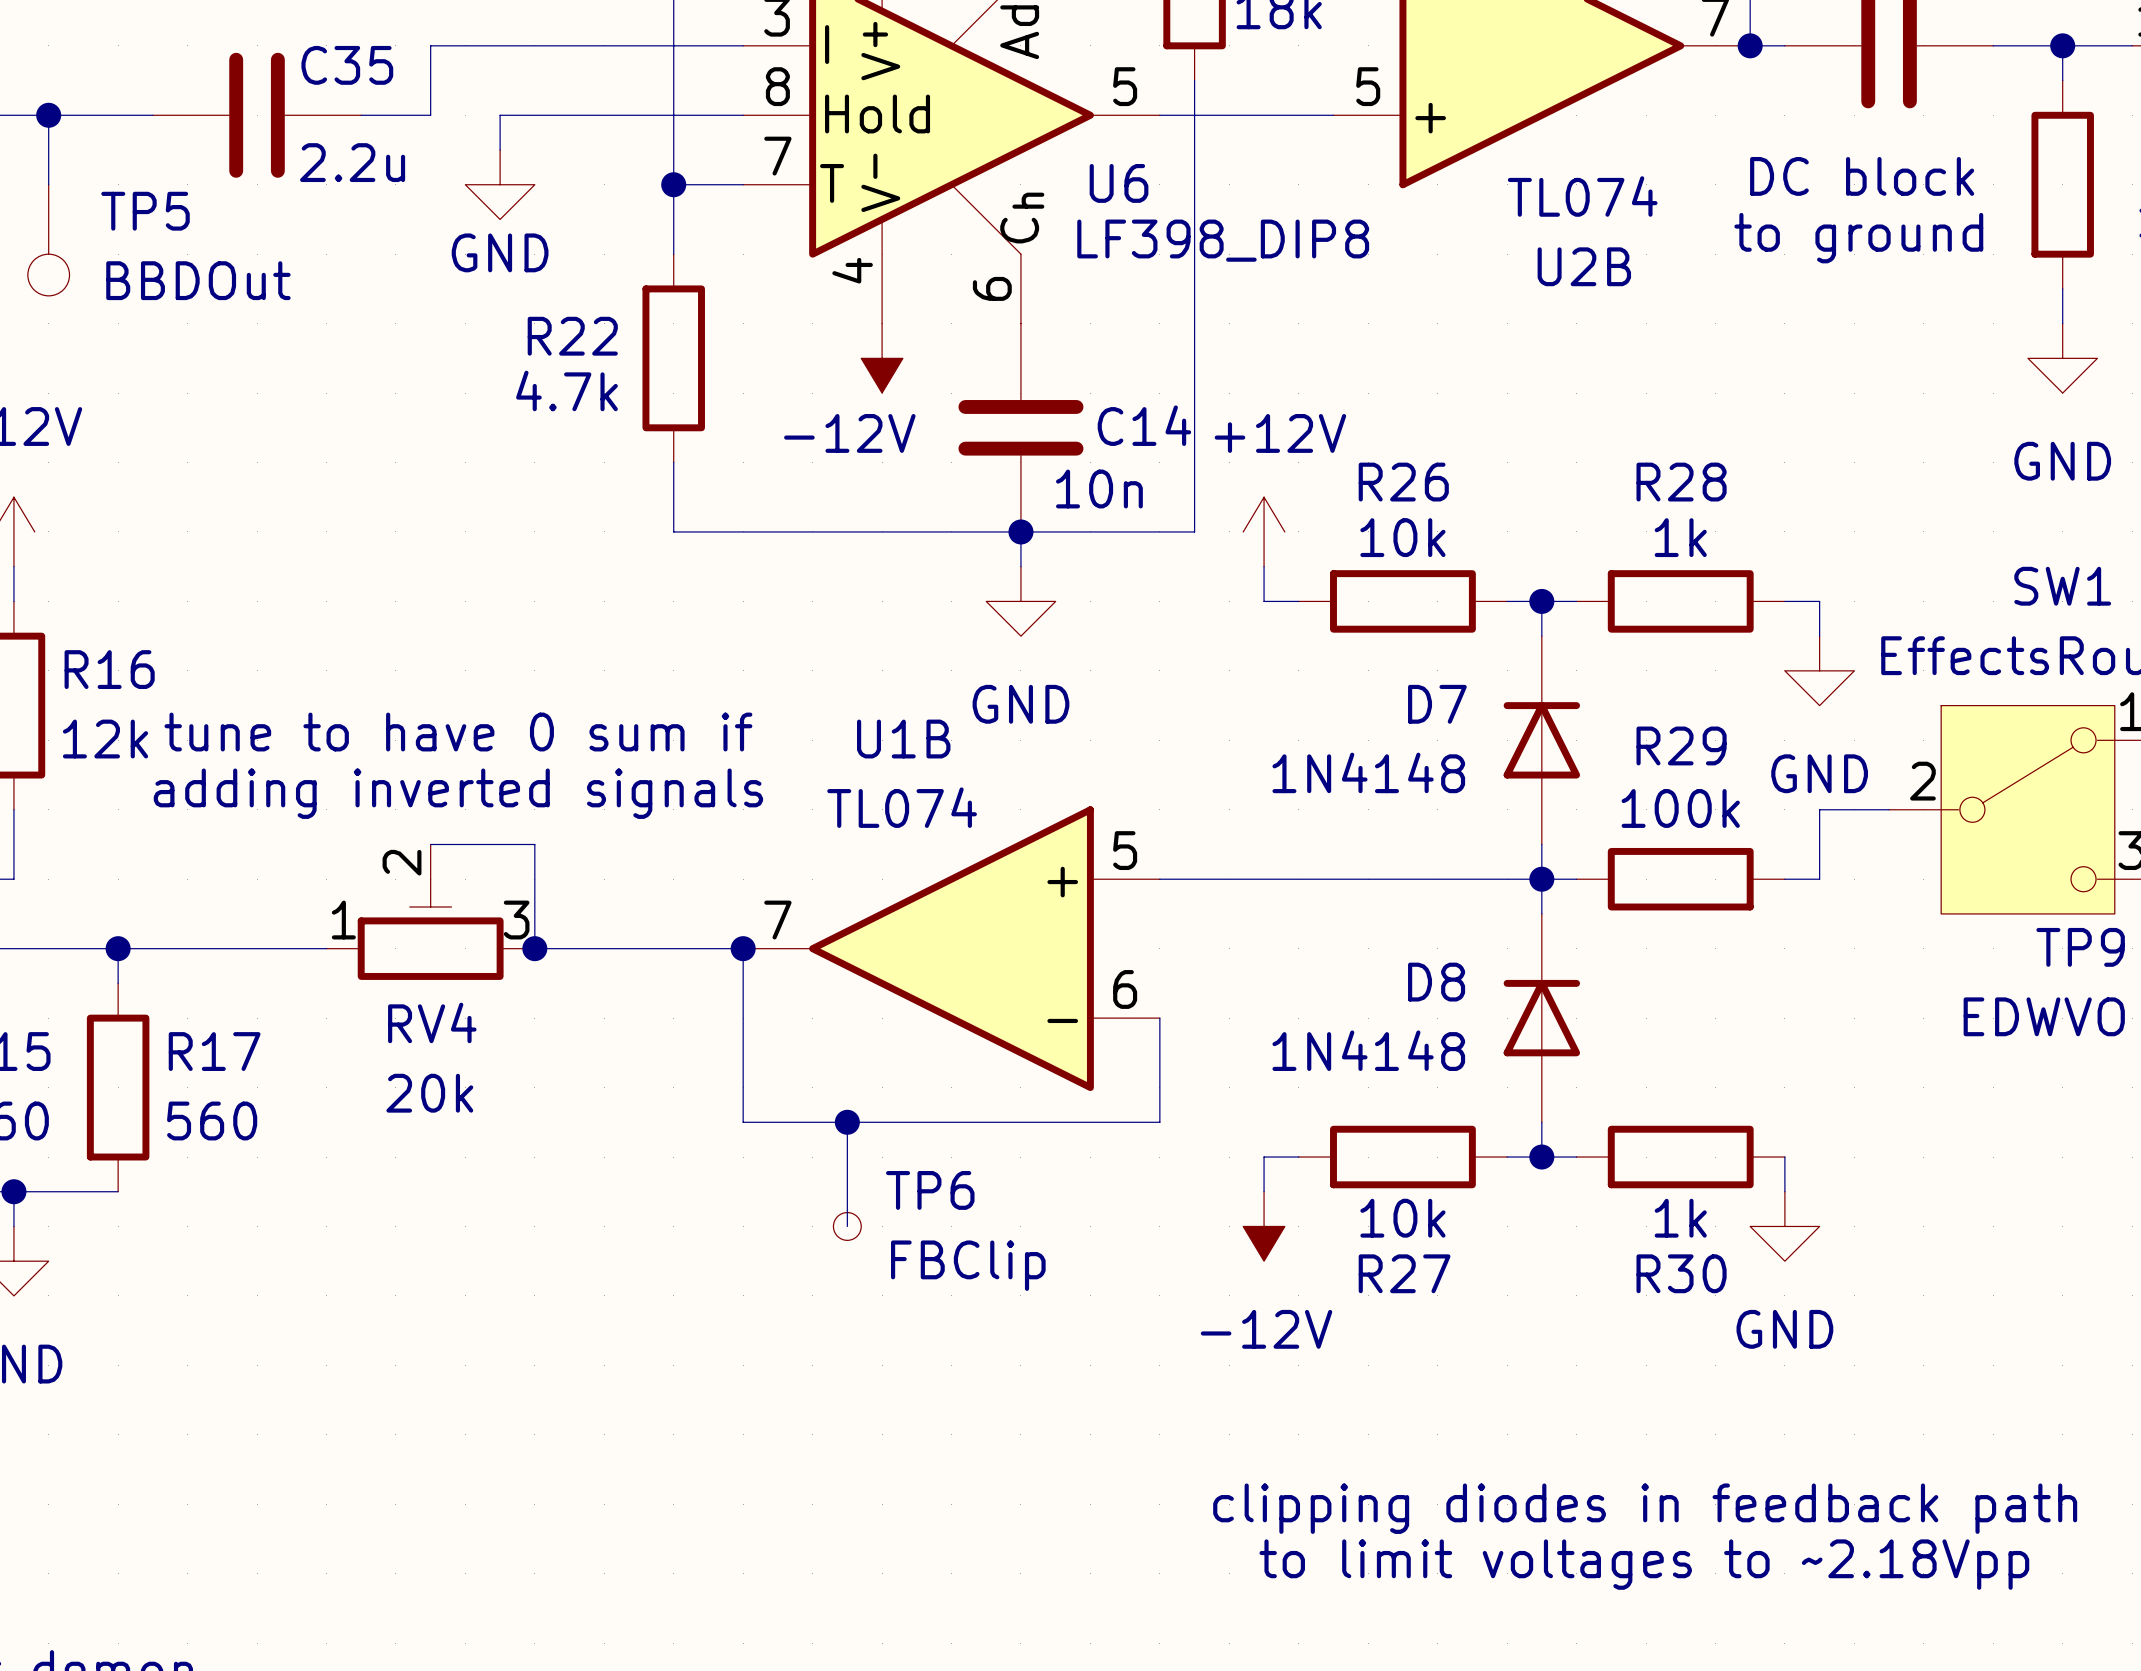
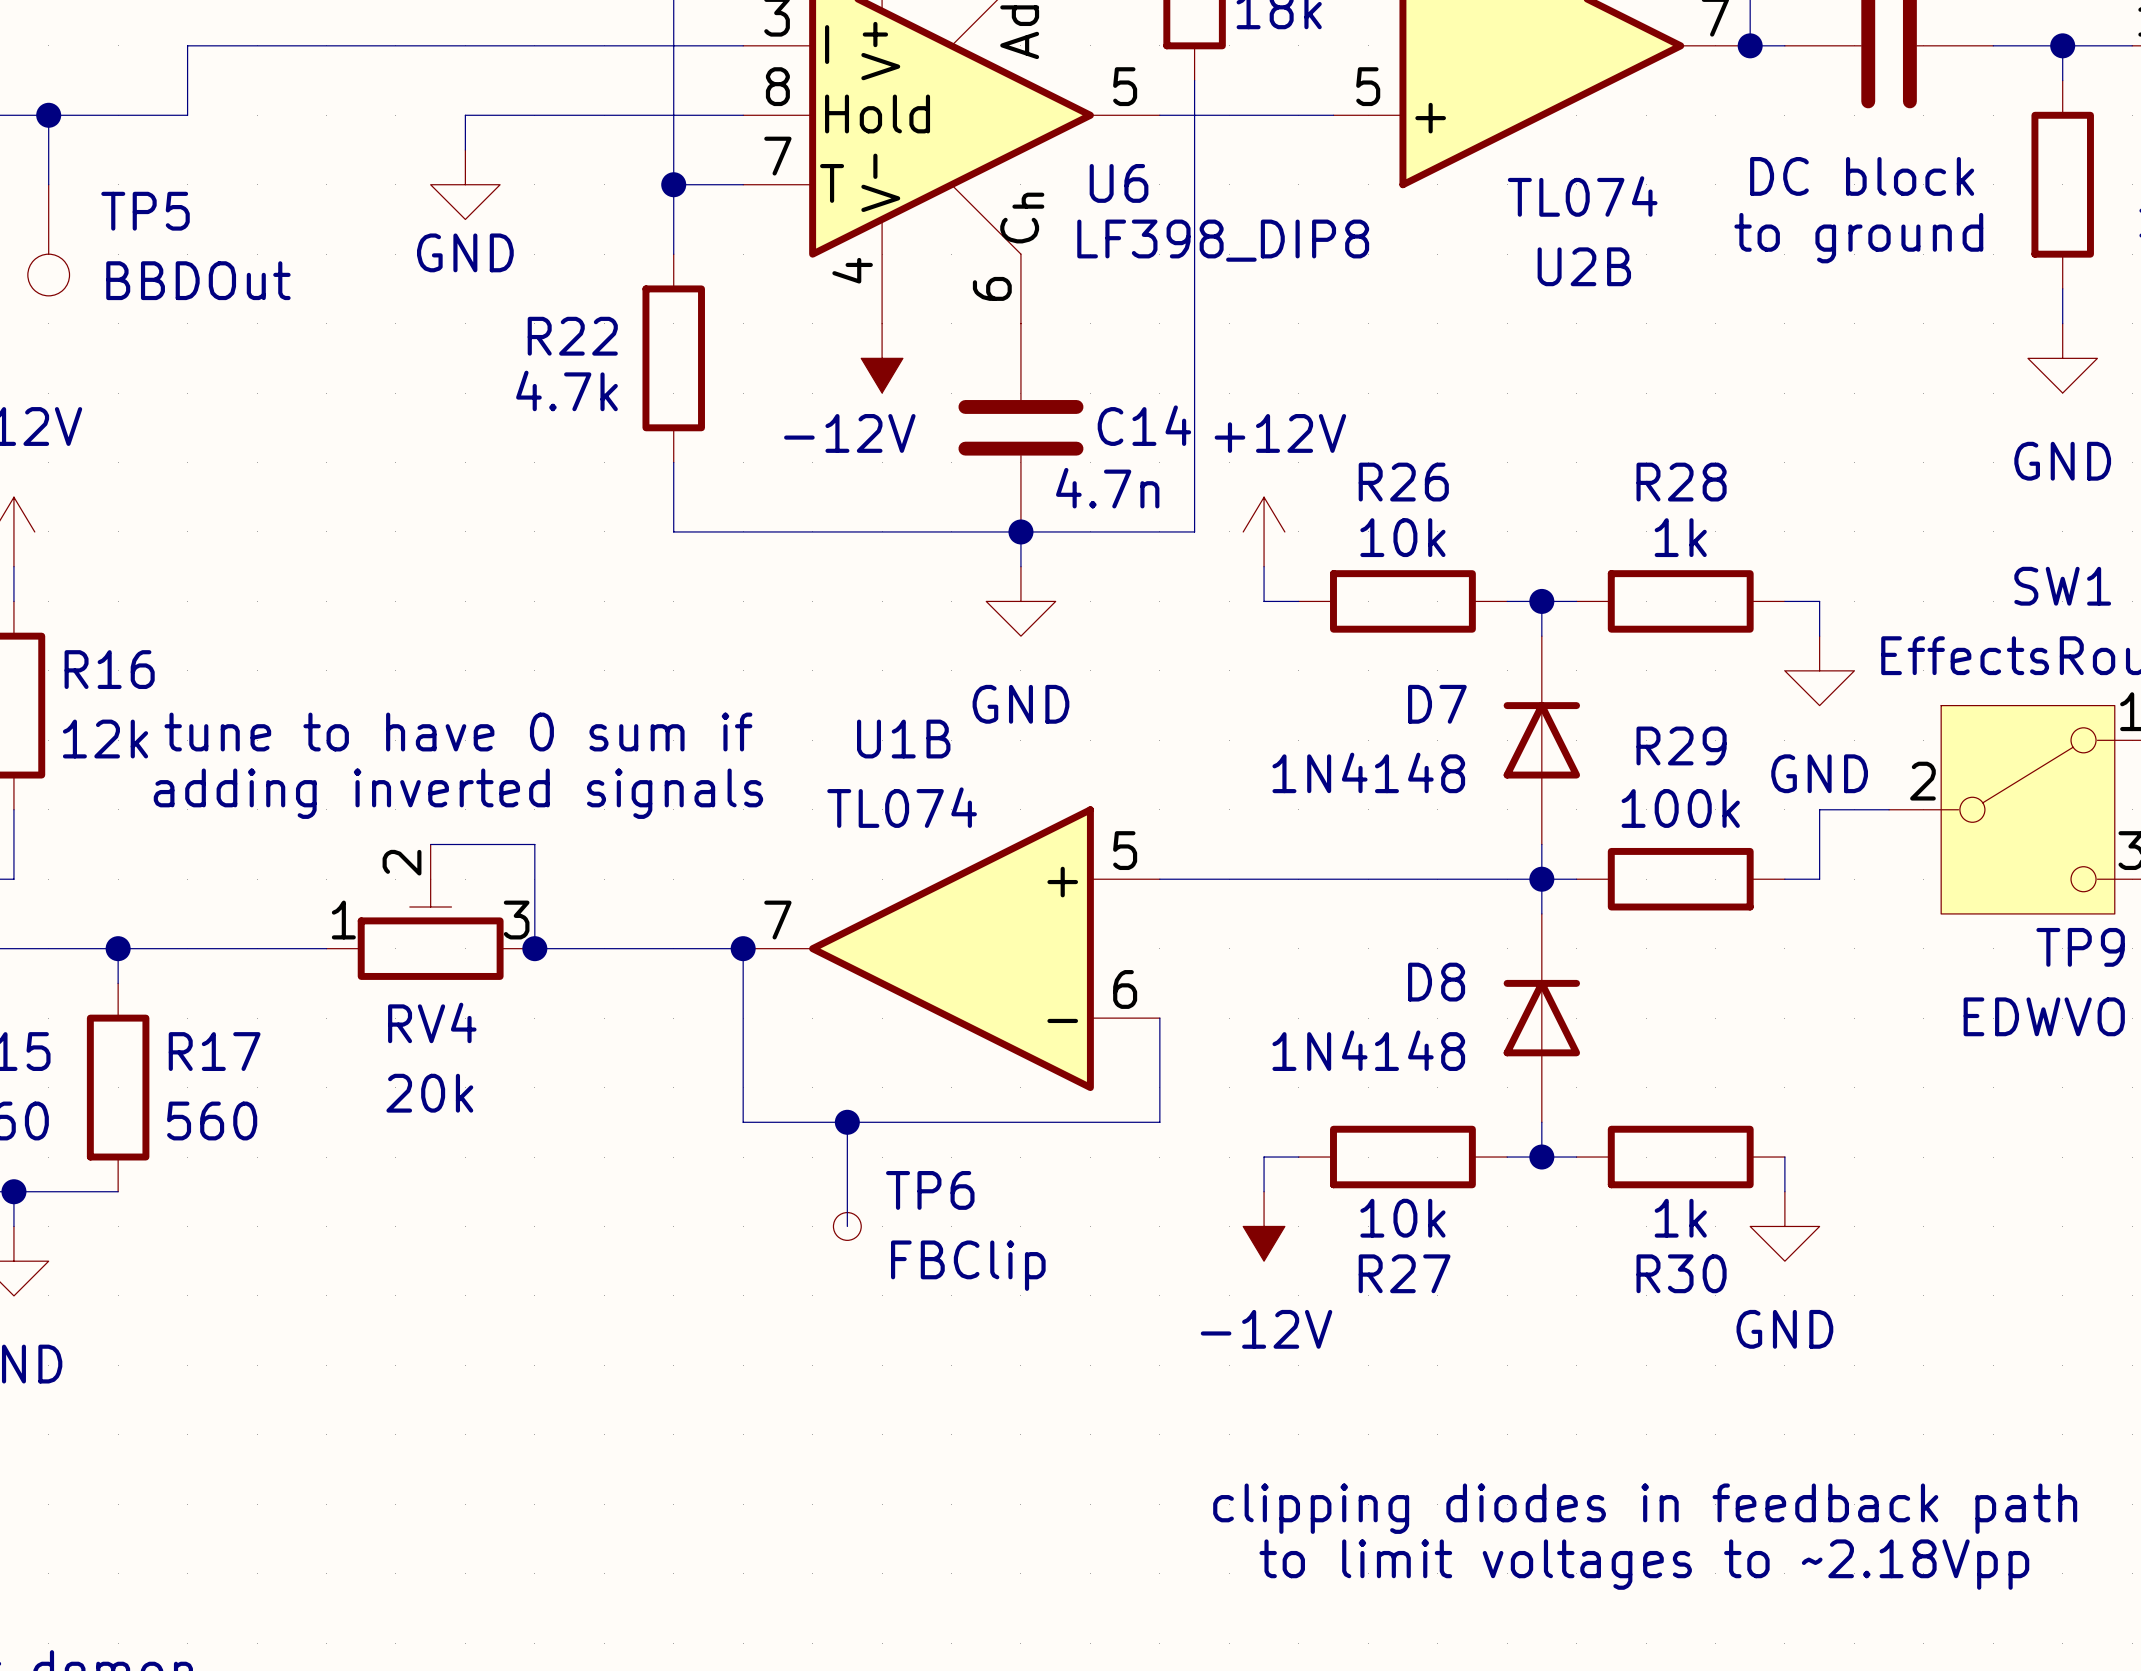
wire: (430, 45) (430, 115) (361, 115) -> (430, 45) (187, 45) (187, 115) (152, 115)
C35: 2.2u (257, 115) -> none
wire: (500, 115) (500, 150) -> (500, 115) (465, 115) (465, 150)
power symbol position: GND (500, 184) -> GND (465, 184)
C14 value: 10n (1099, 489) -> 4.7n (1107, 488)

